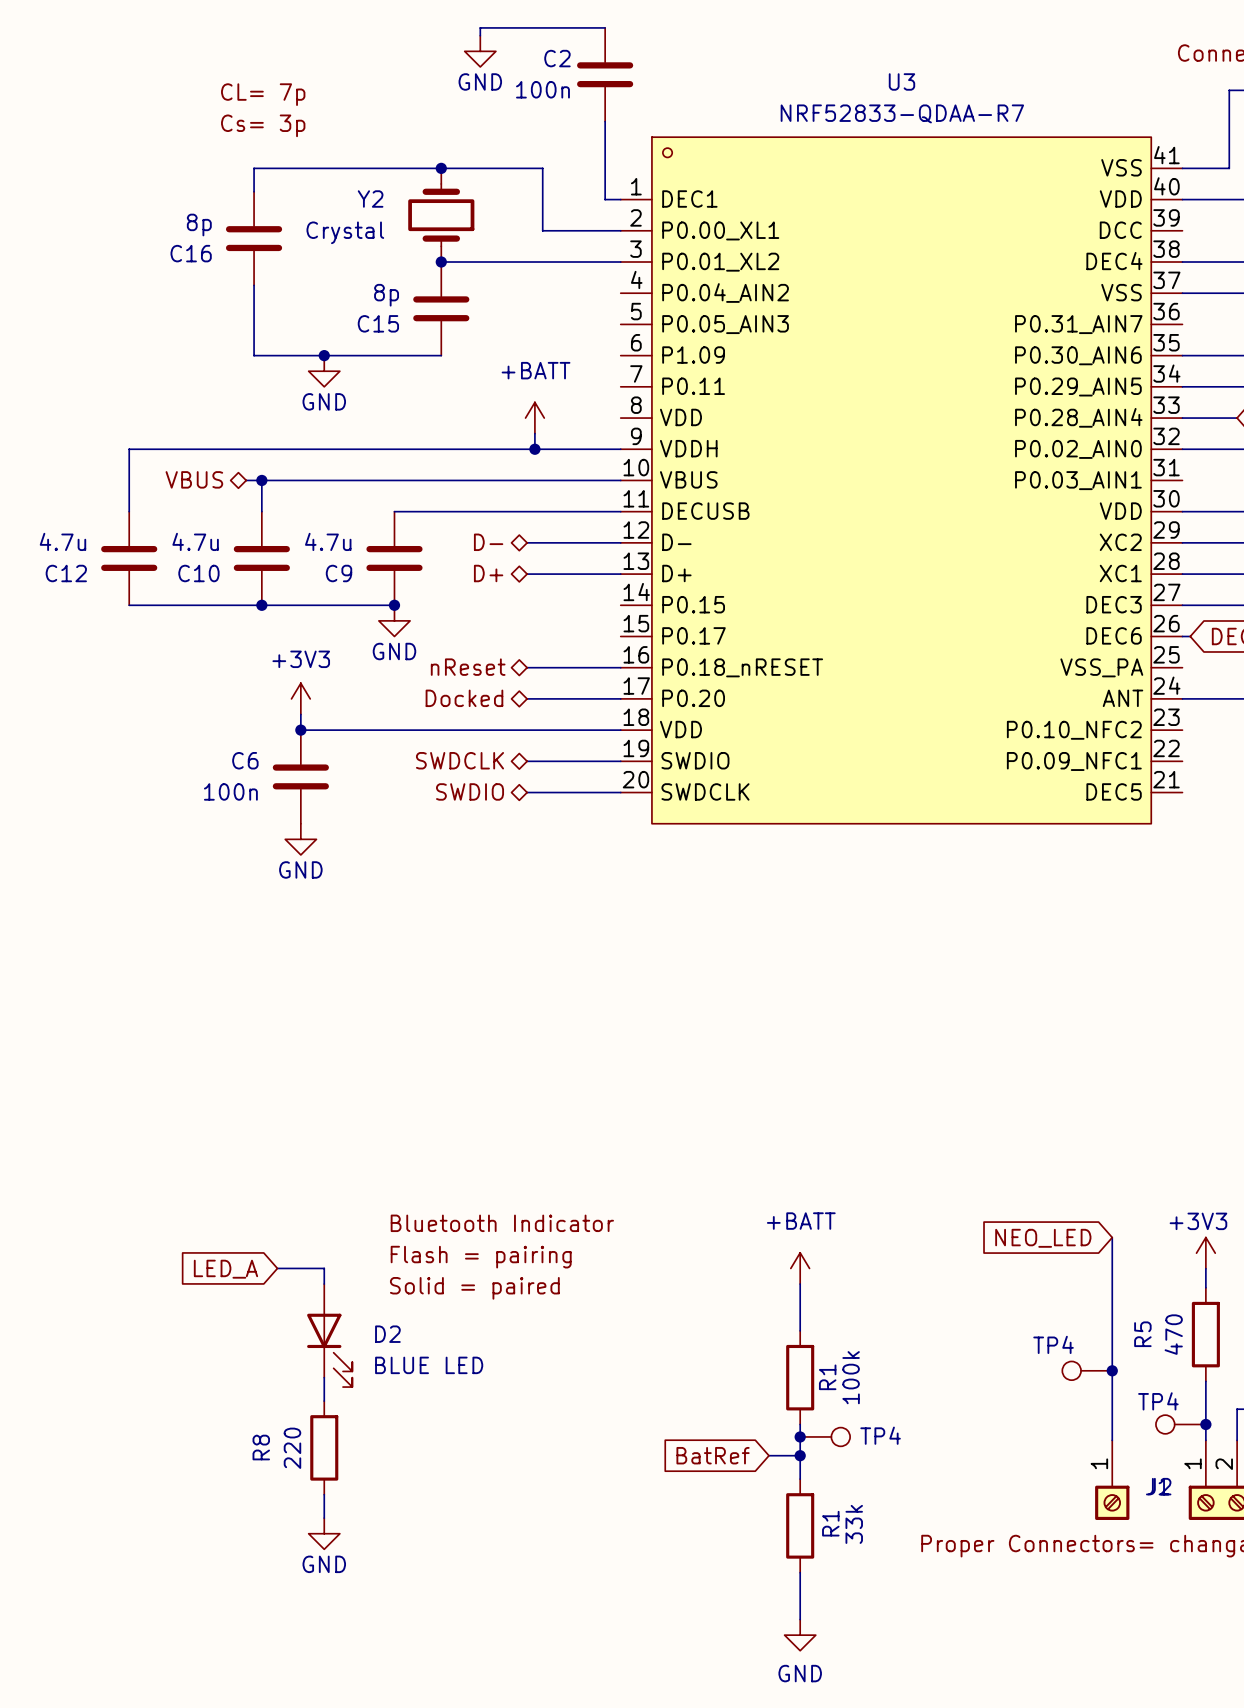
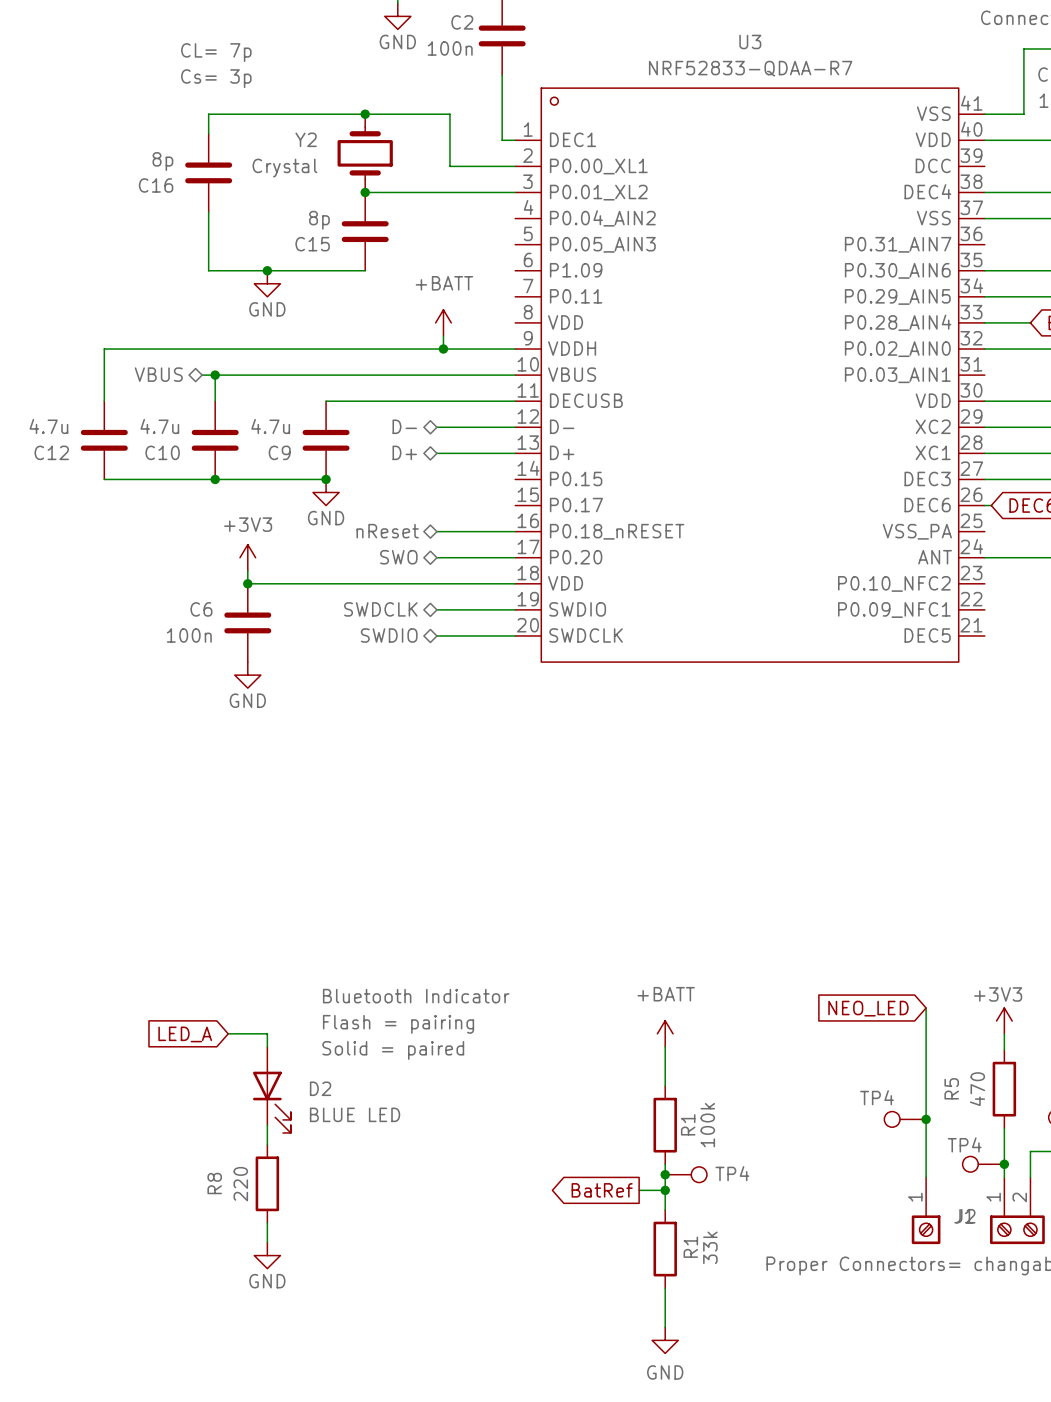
hierarchical label: Docked (464, 698) -> SWO (398, 557)
global label shape: input (713, 1455) -> output (602, 1190)

